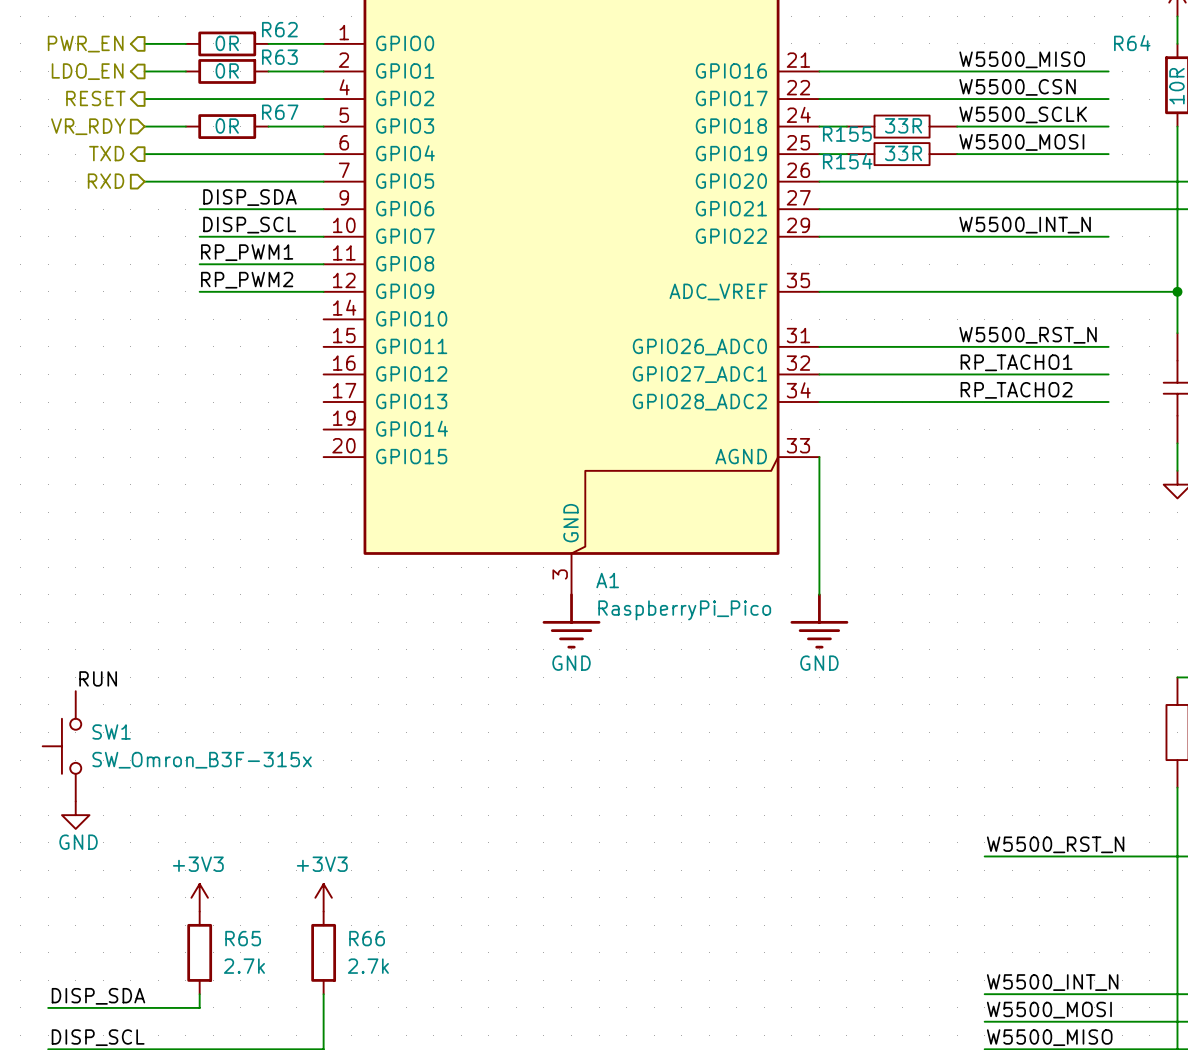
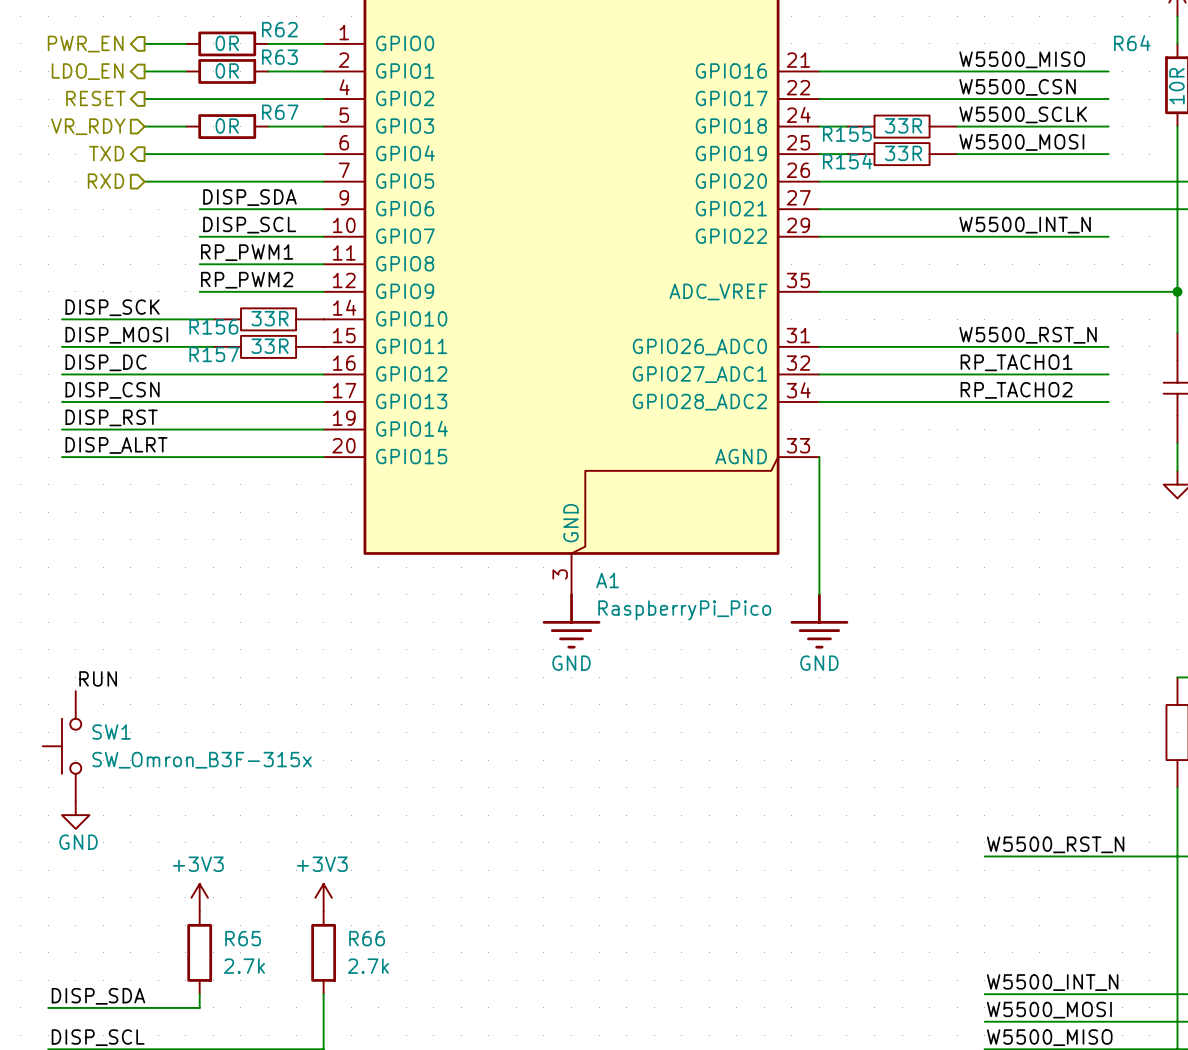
label: none -> DISP_SCK (112, 307)
wire: none -> (61, 319) (213, 319)
R156: none -> (268, 319)
label: none -> DISP_MOSI (116, 335)
wire: none -> (61, 346) (213, 346)
R157: none -> (268, 346)
label: none -> DISP_DC (106, 362)
wire: none -> (61, 374) (323, 374)
label: none -> DISP_CSN (112, 390)
wire: none -> (61, 402) (323, 402)
label: none -> DISP_RST (111, 417)
wire: none -> (61, 429) (323, 429)
label: none -> DISP_ALRT (116, 445)
wire: none -> (61, 457) (323, 457)

